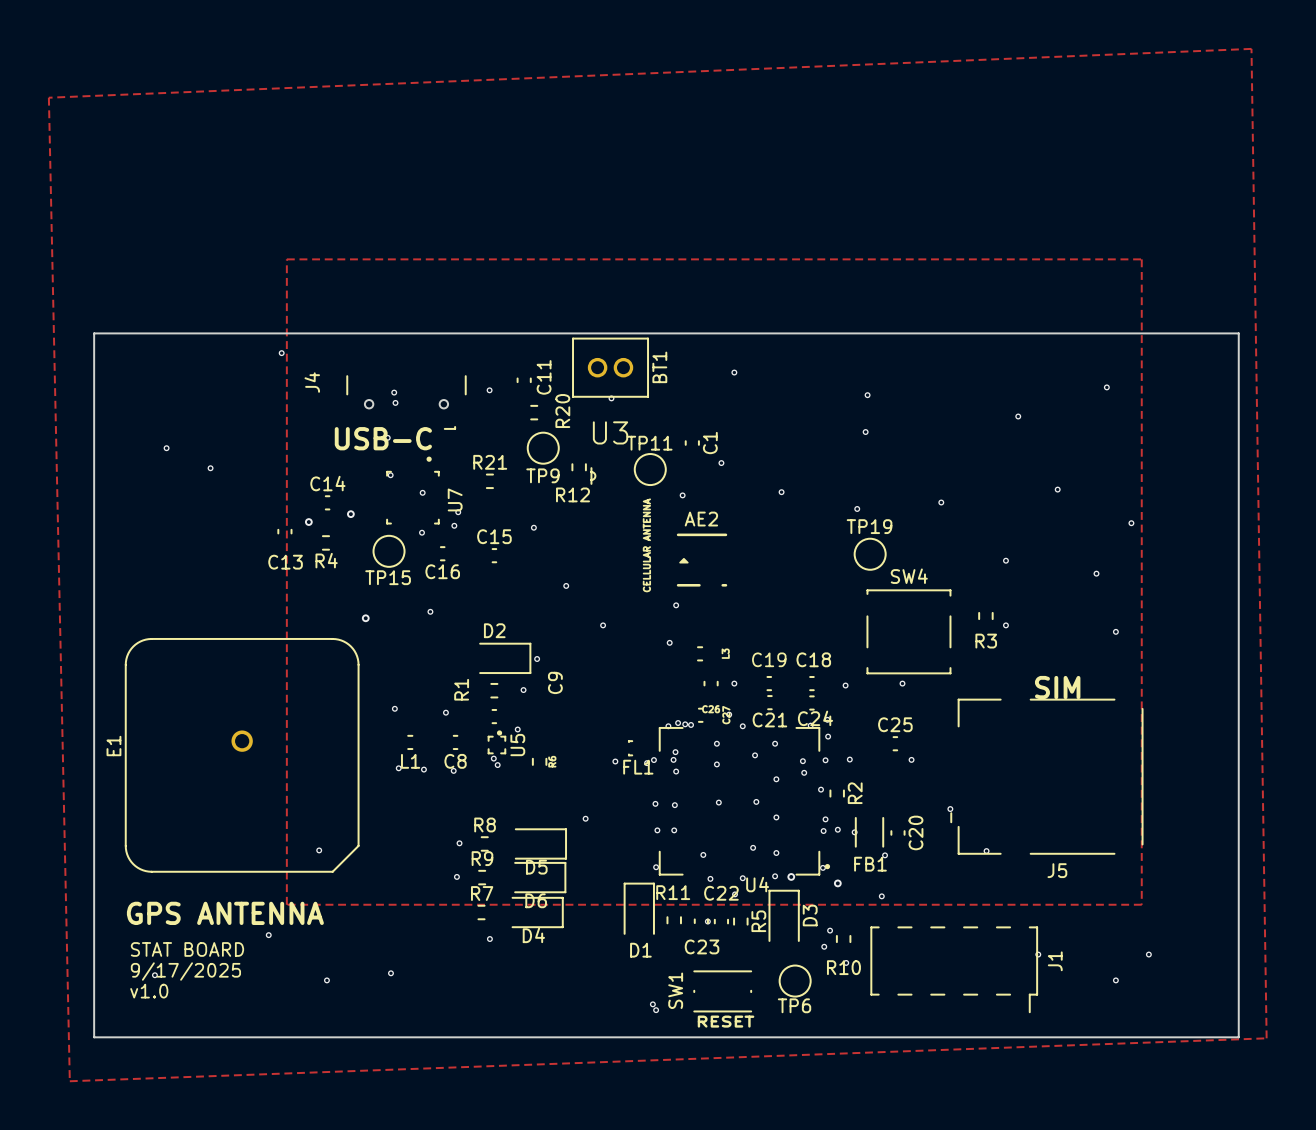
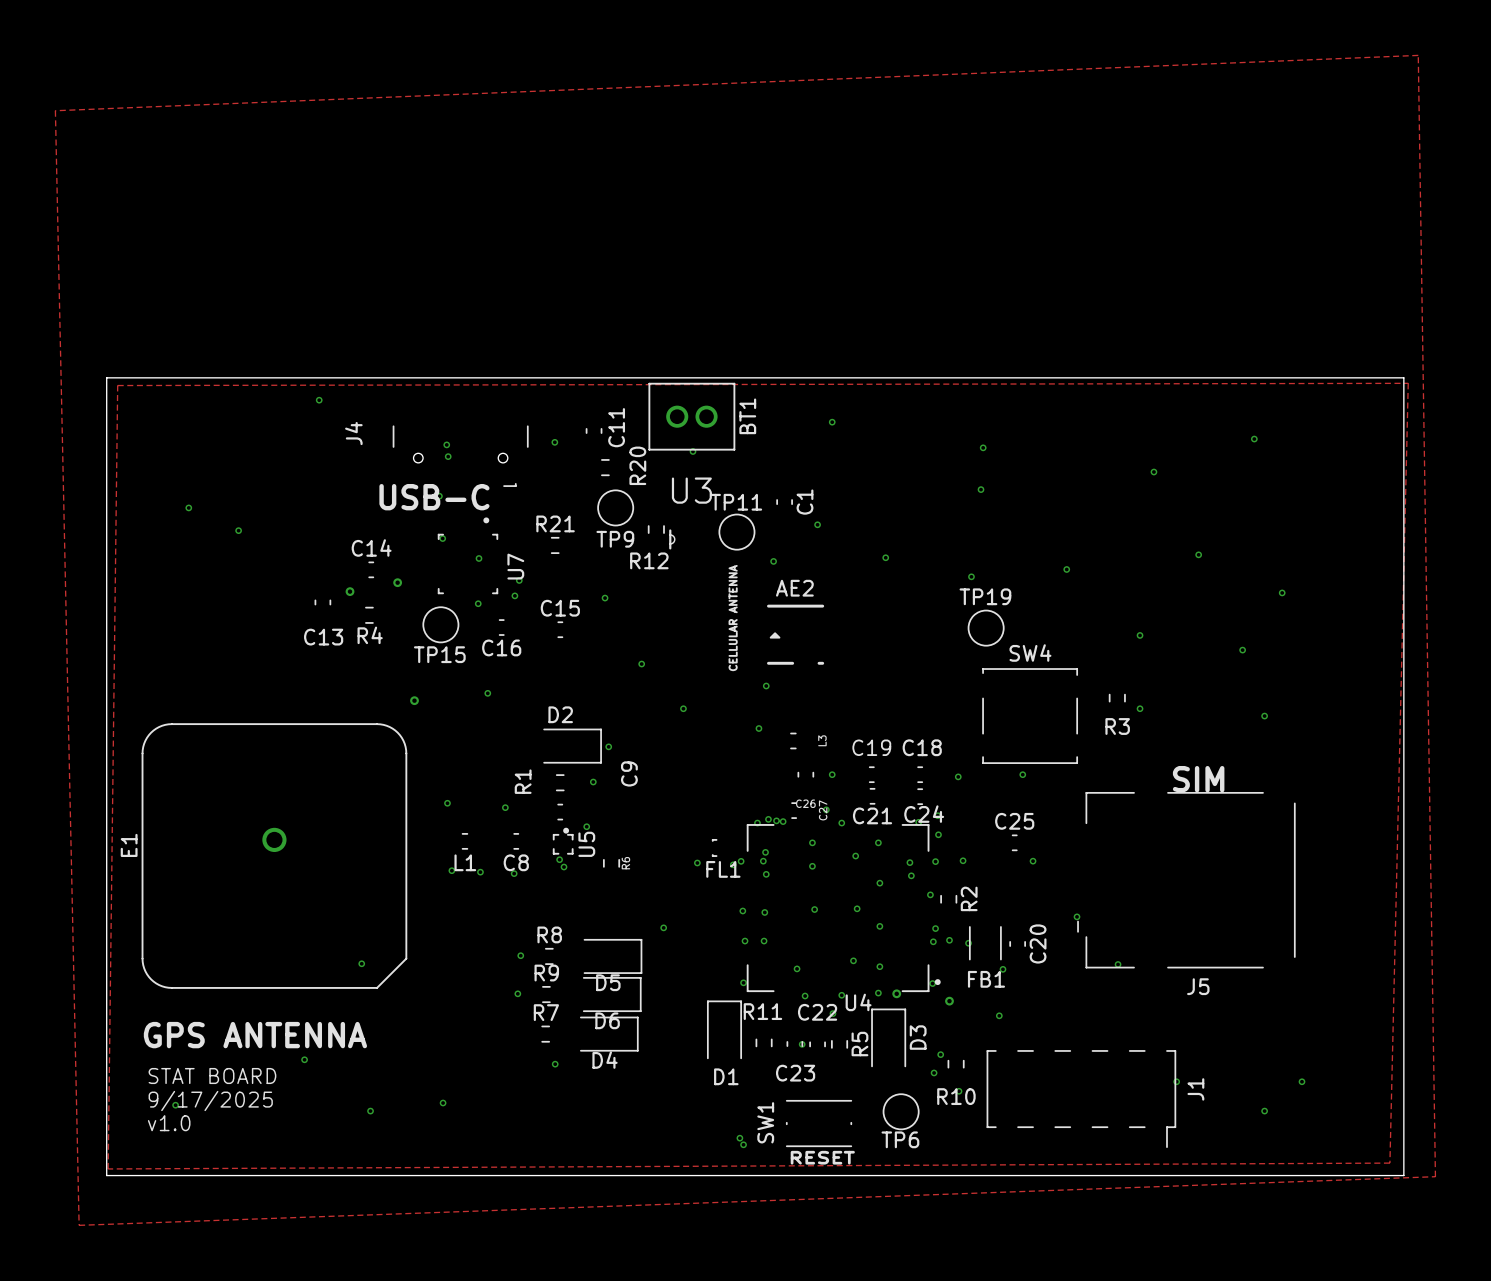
zone outline: (286, 259) (1141, 259) (1141, 904) (286, 904) (286, 259) -> (1408, 383) (117, 385) (108, 1168) (1389, 1163) (1408, 383)

